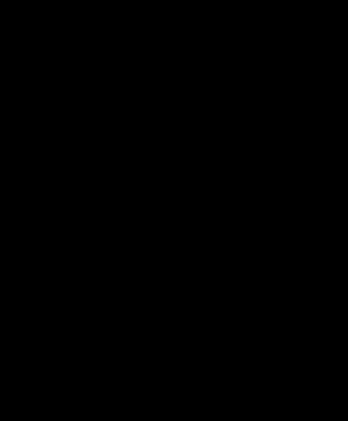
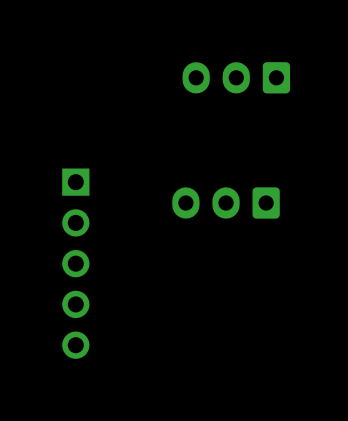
part: none -> (236, 77)
part: none -> (226, 203)
part: none -> (75, 263)

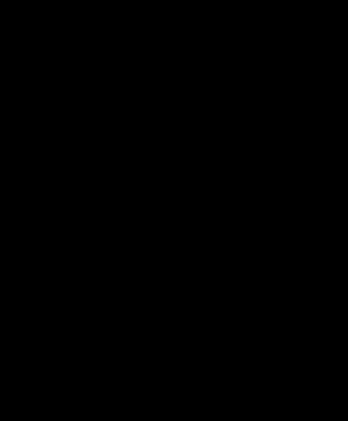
part: (236, 77) -> none
part: (226, 203) -> none
part: (75, 263) -> none

